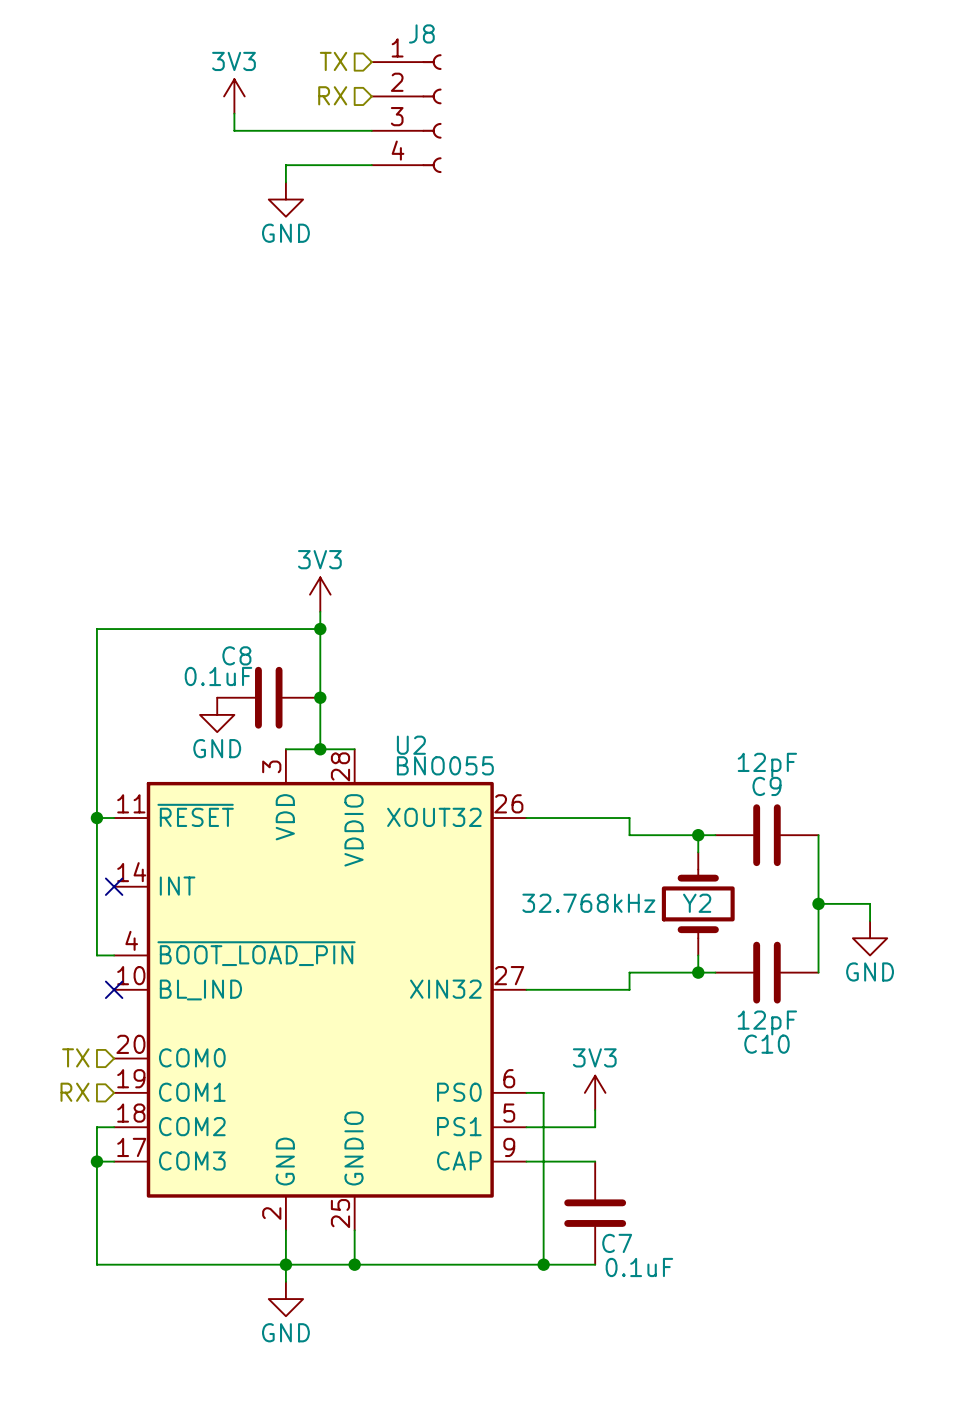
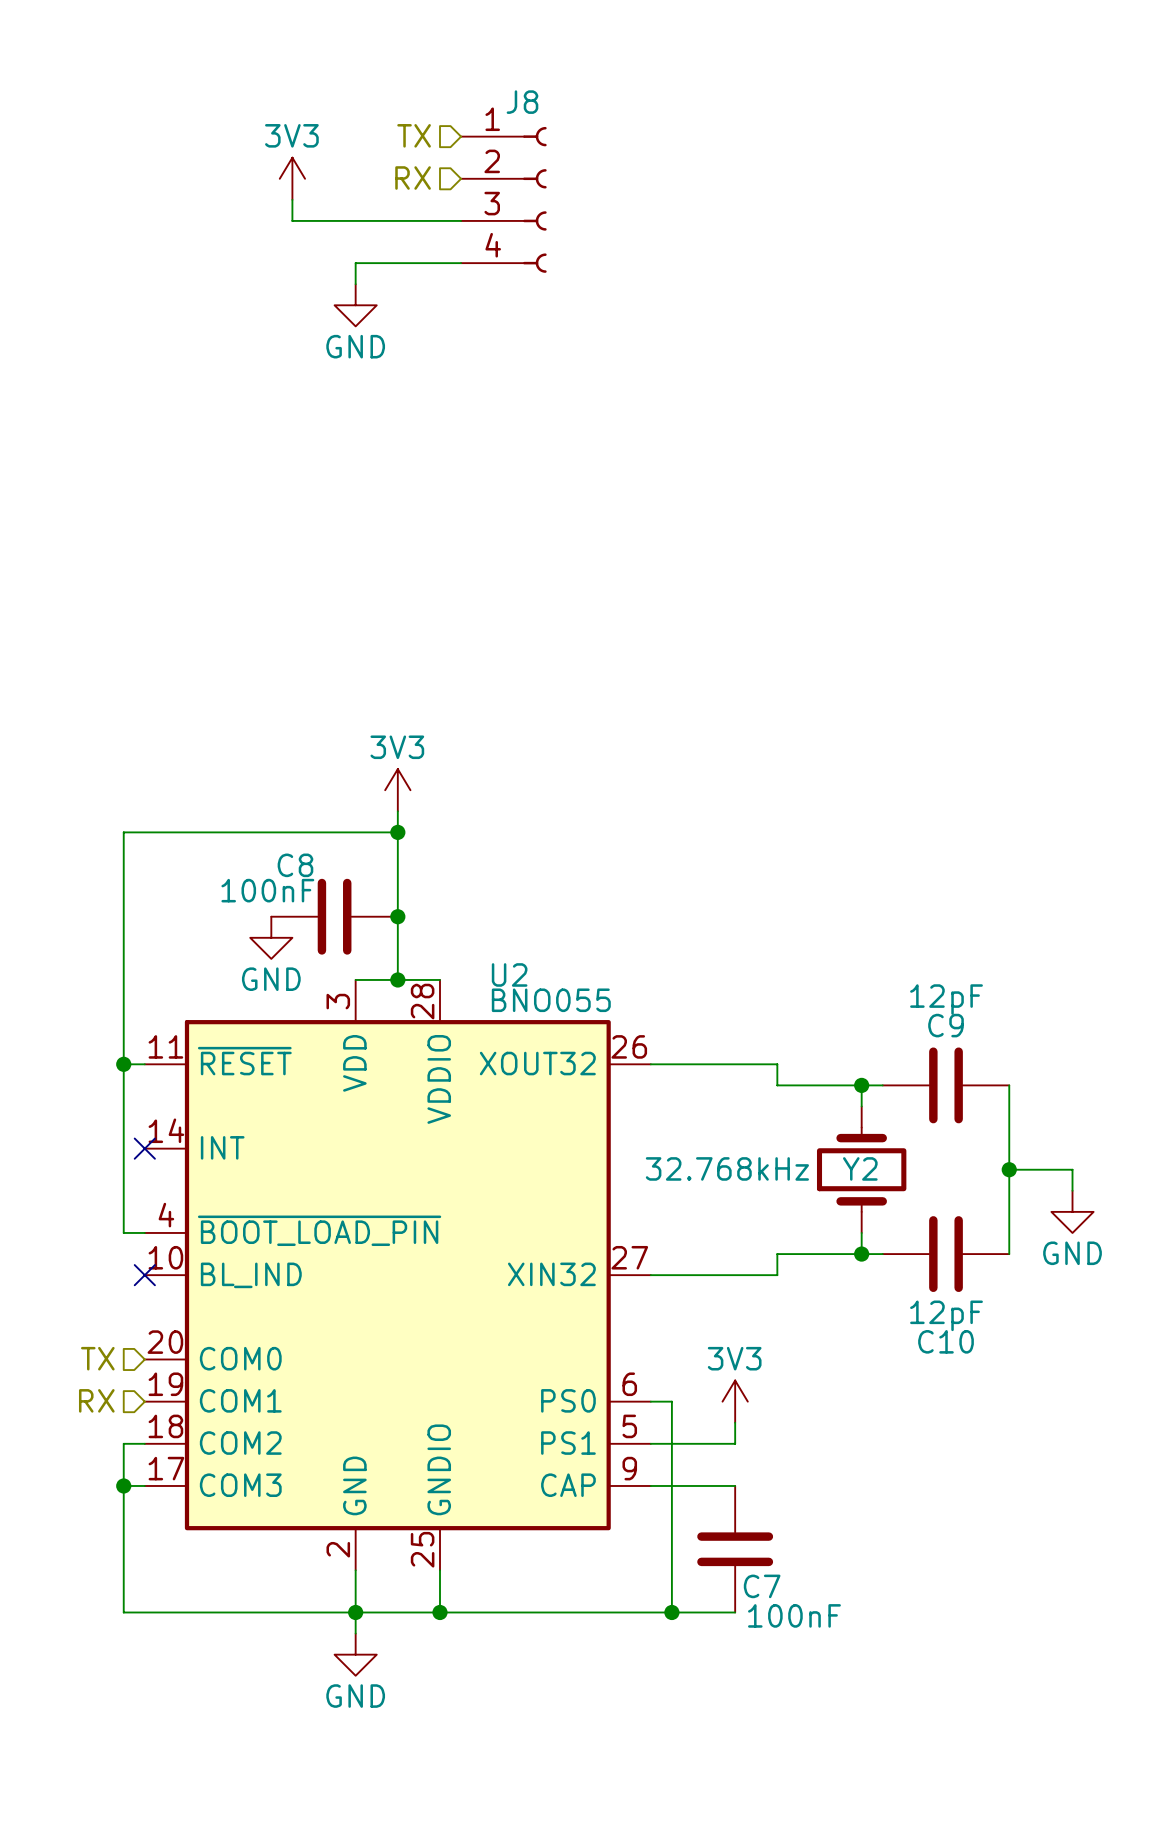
C8 value: 0.1uF (218, 676) -> 100nF (267, 890)
C7 value: 0.1uF (639, 1267) -> 100nF (794, 1615)

